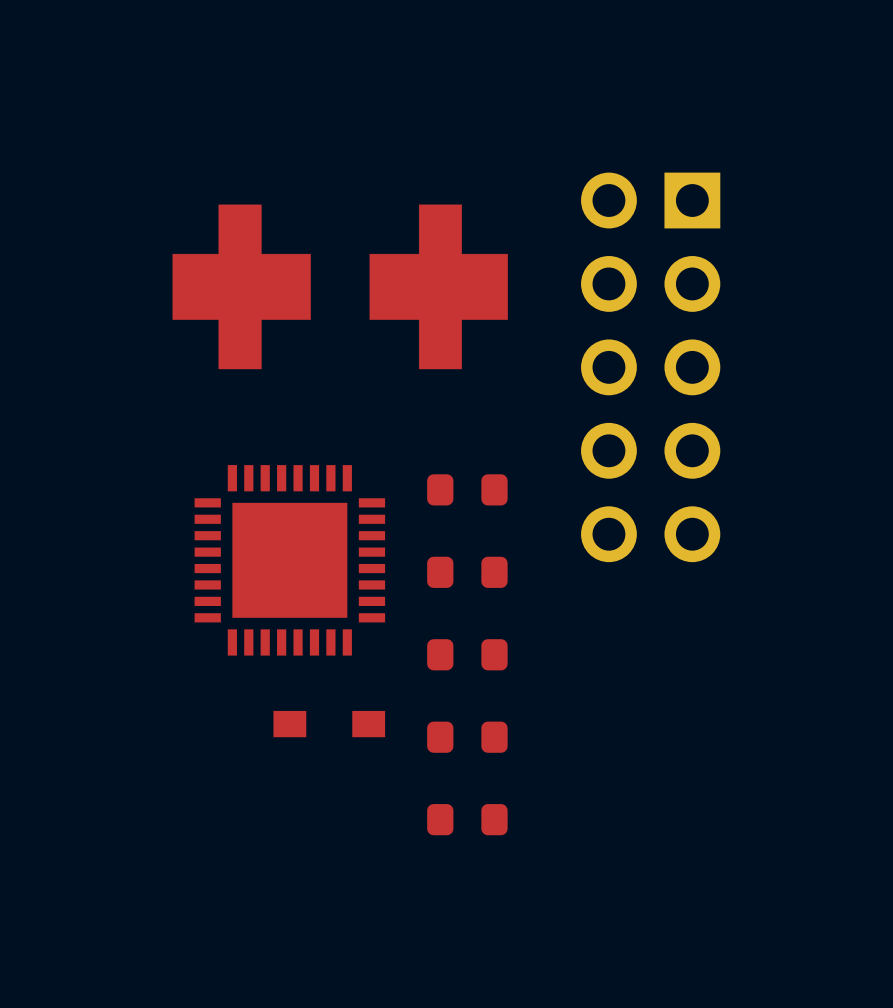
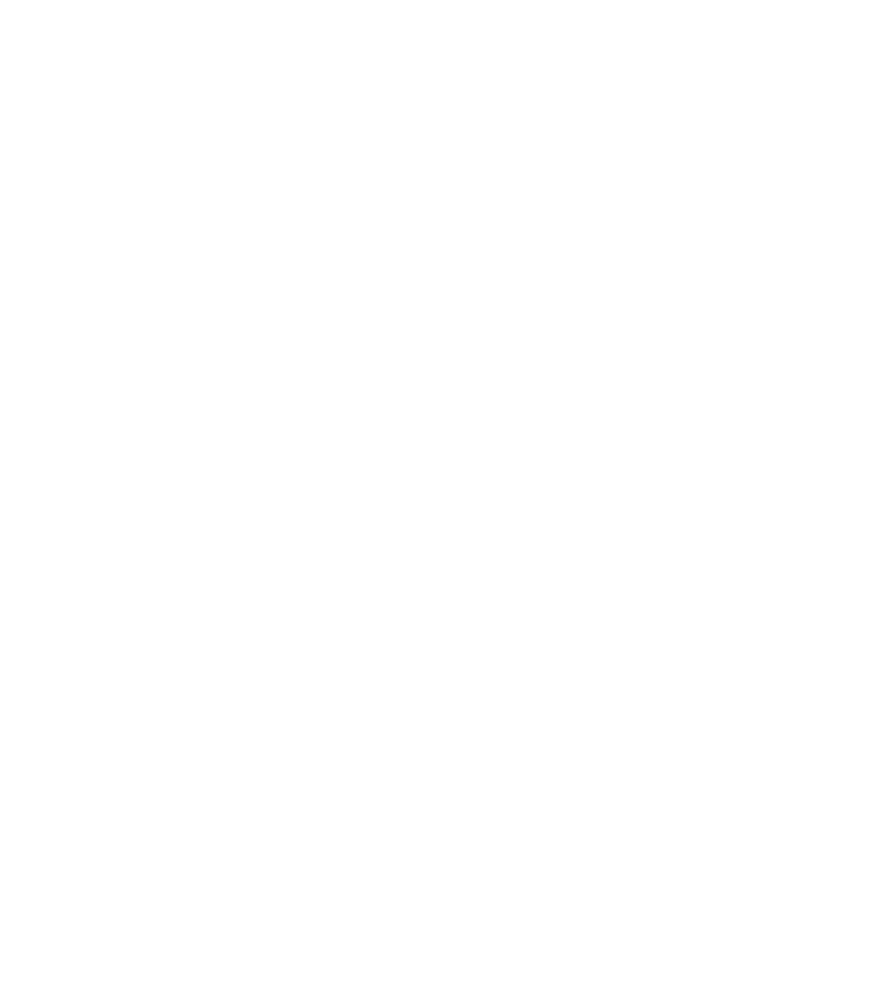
part: (340, 286) -> none
part: (650, 367) -> none
part: (467, 489) -> none
part: (289, 560) -> none
part: (467, 572) -> none
part: (467, 654) -> none
part: (329, 724) -> none
part: (467, 737) -> none
part: (467, 819) -> none

